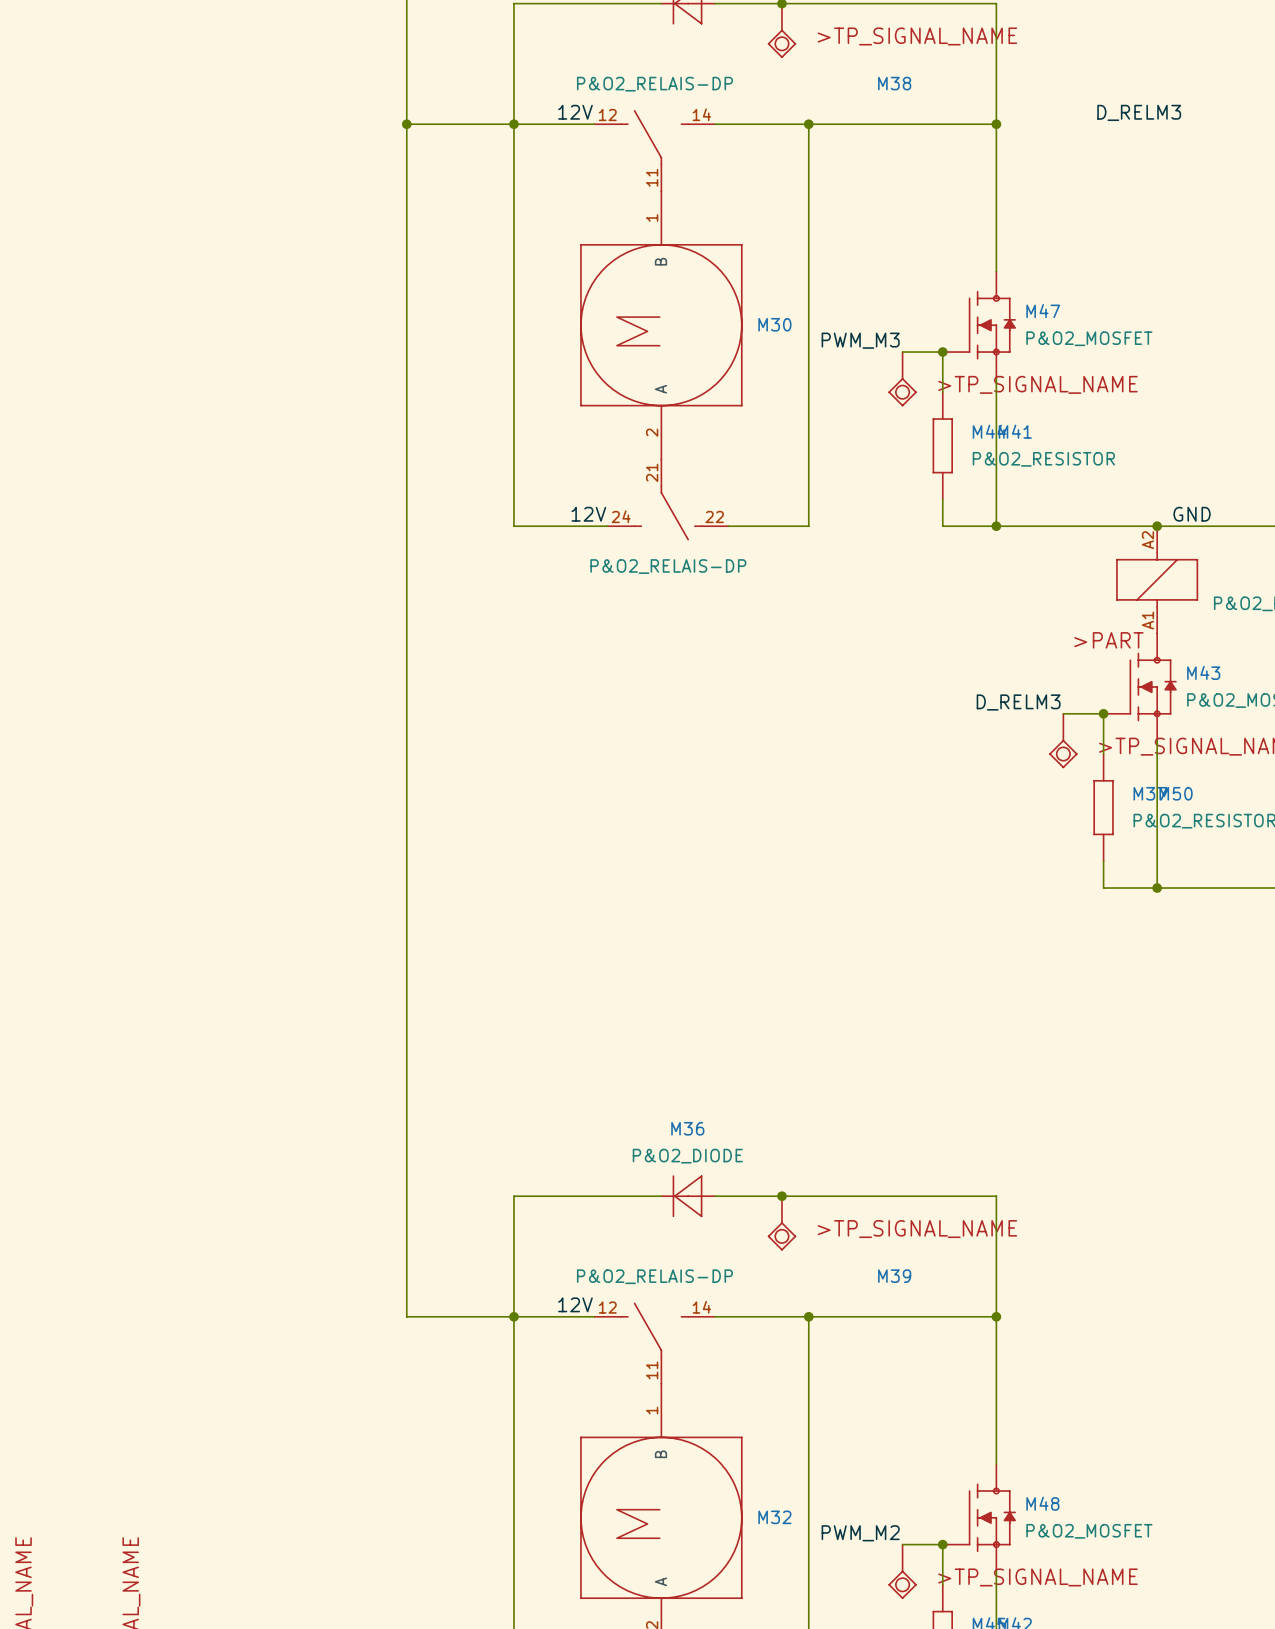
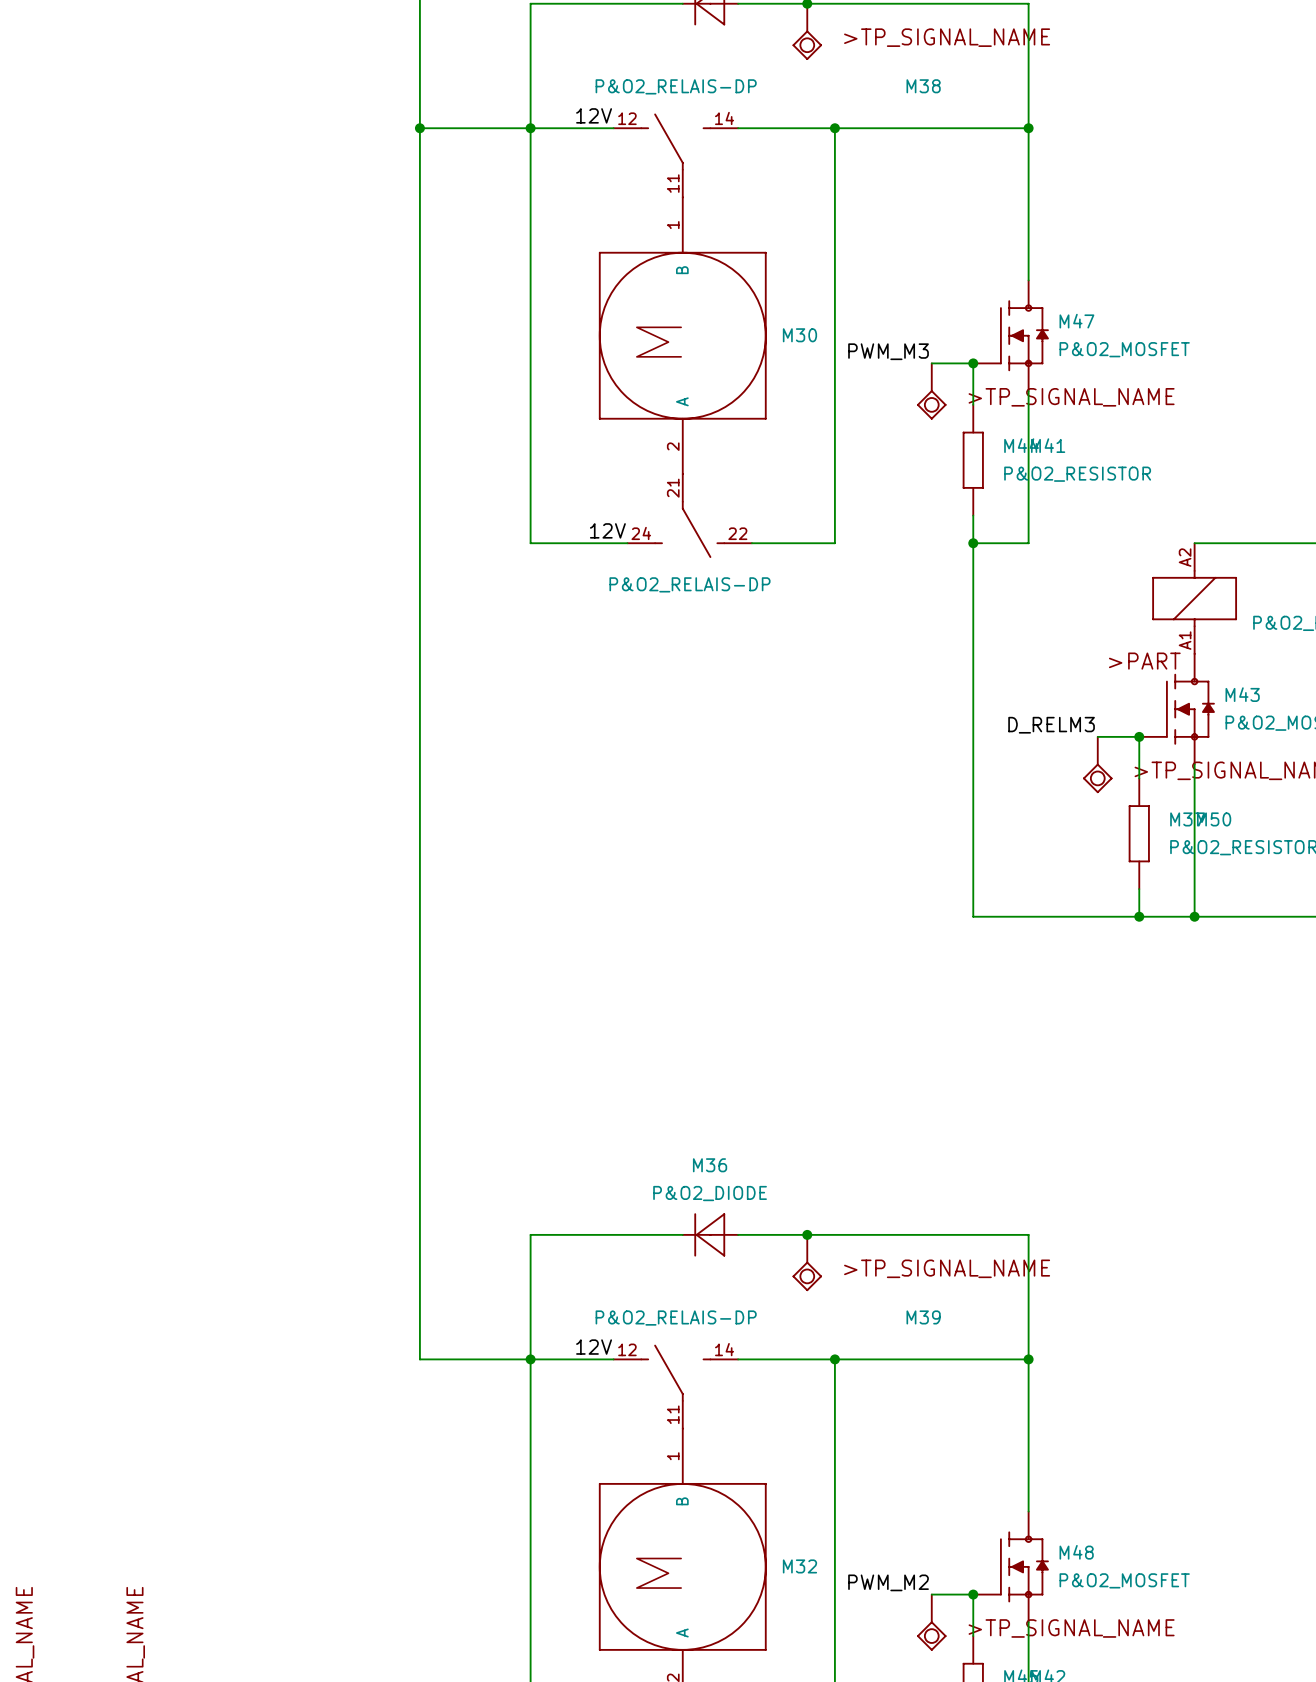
label: D_RELM3 (1139, 112) -> none
label: GND (1192, 514) -> none
wire: none -> (973, 543) (973, 916) (1139, 916)
wire: (996, 526) (1157, 526) -> none
junction position: (996, 526) -> (973, 543)
junction: (1157, 526) -> none
junction: none -> (1139, 916)

